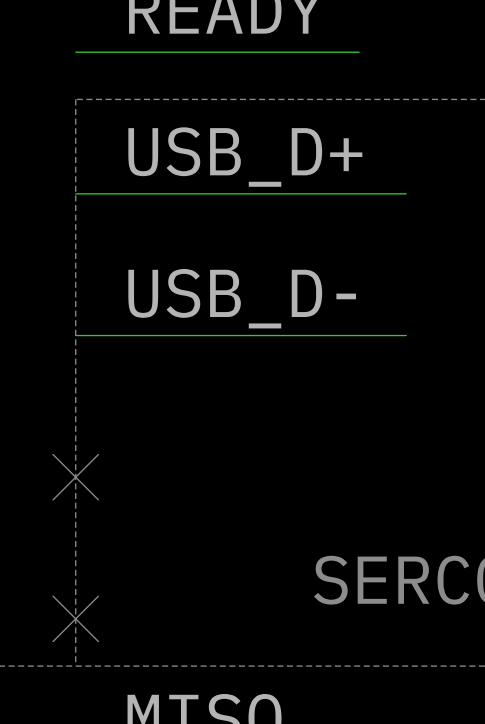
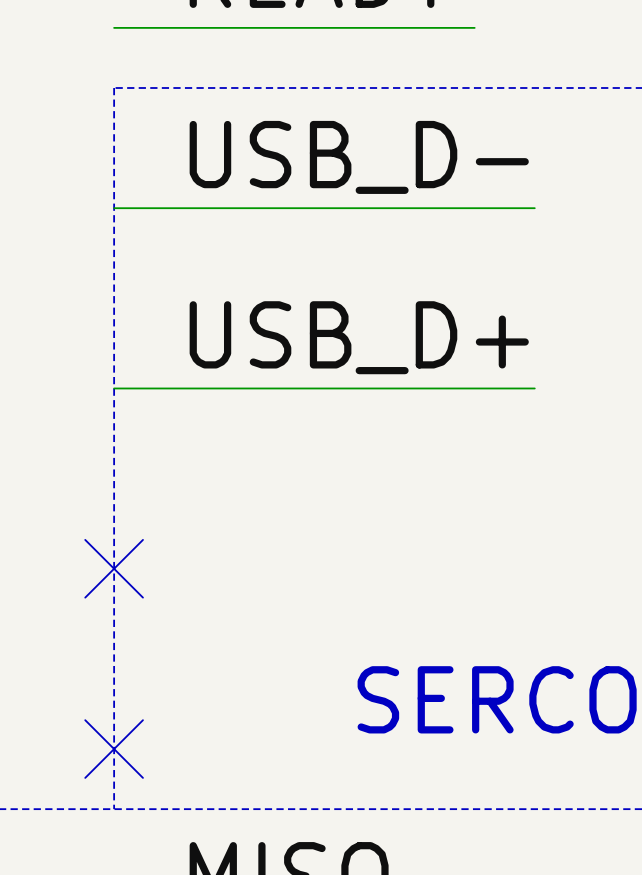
label: USB_D+ (245, 157) -> USB_D- (359, 157)
label: USB_D- (242, 298) -> USB_D+ (359, 337)

